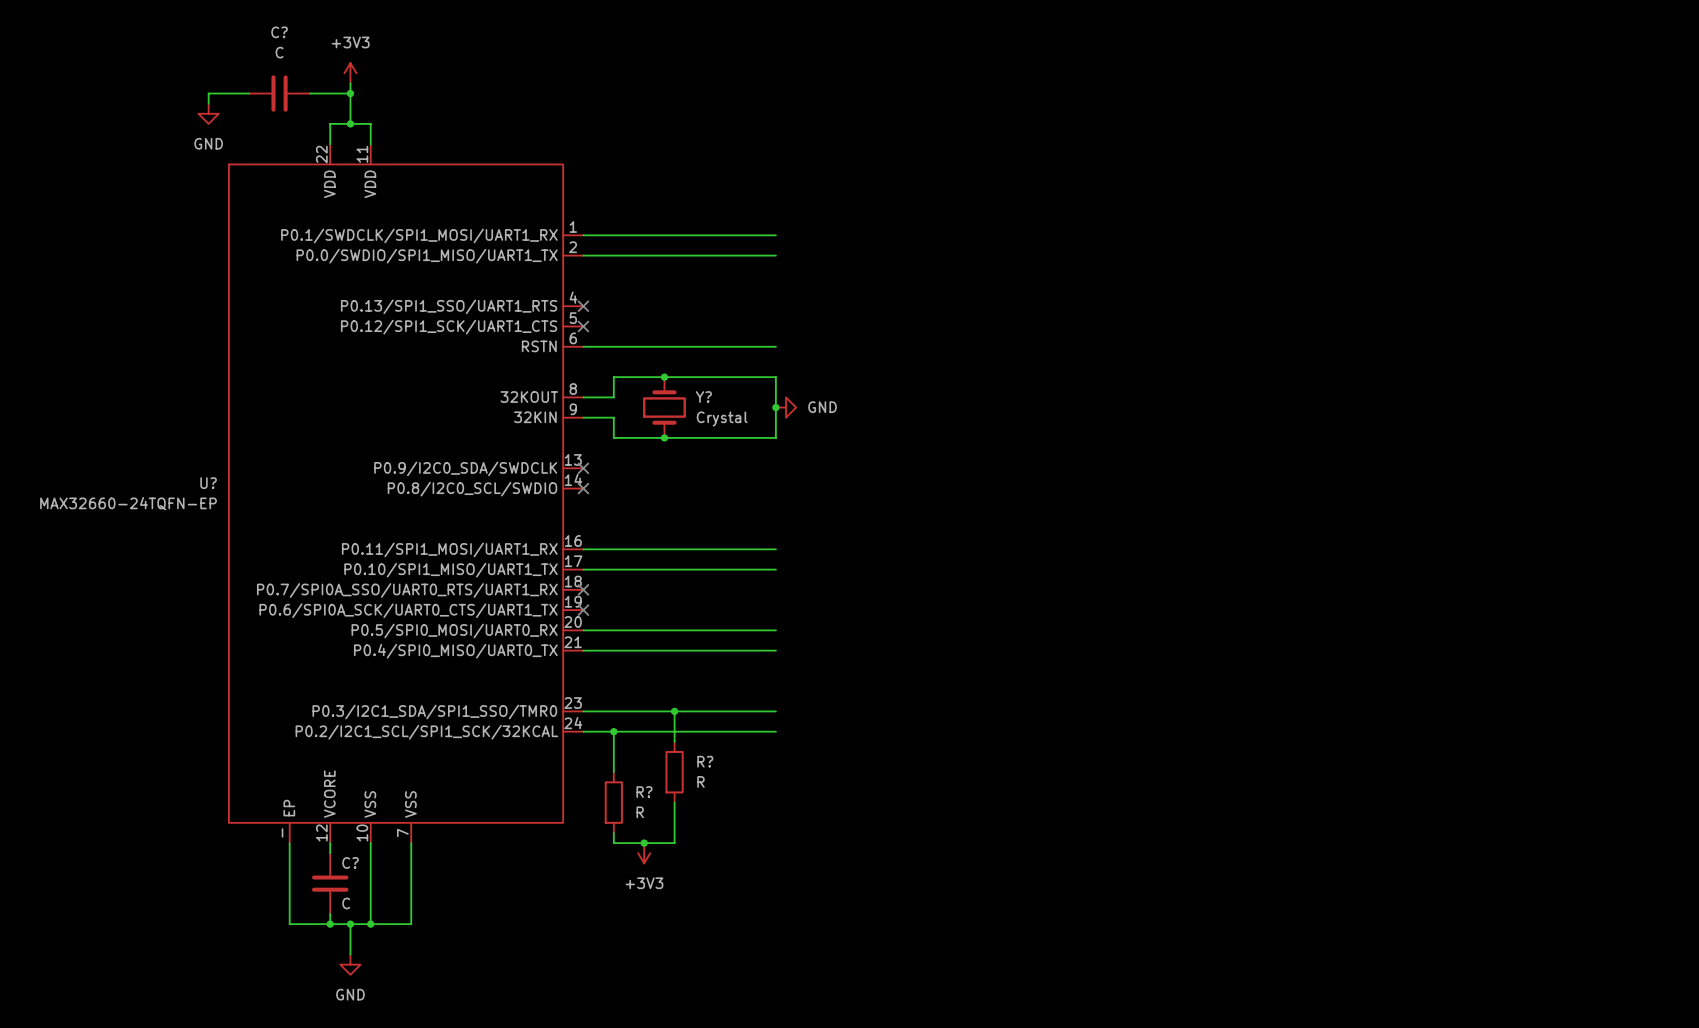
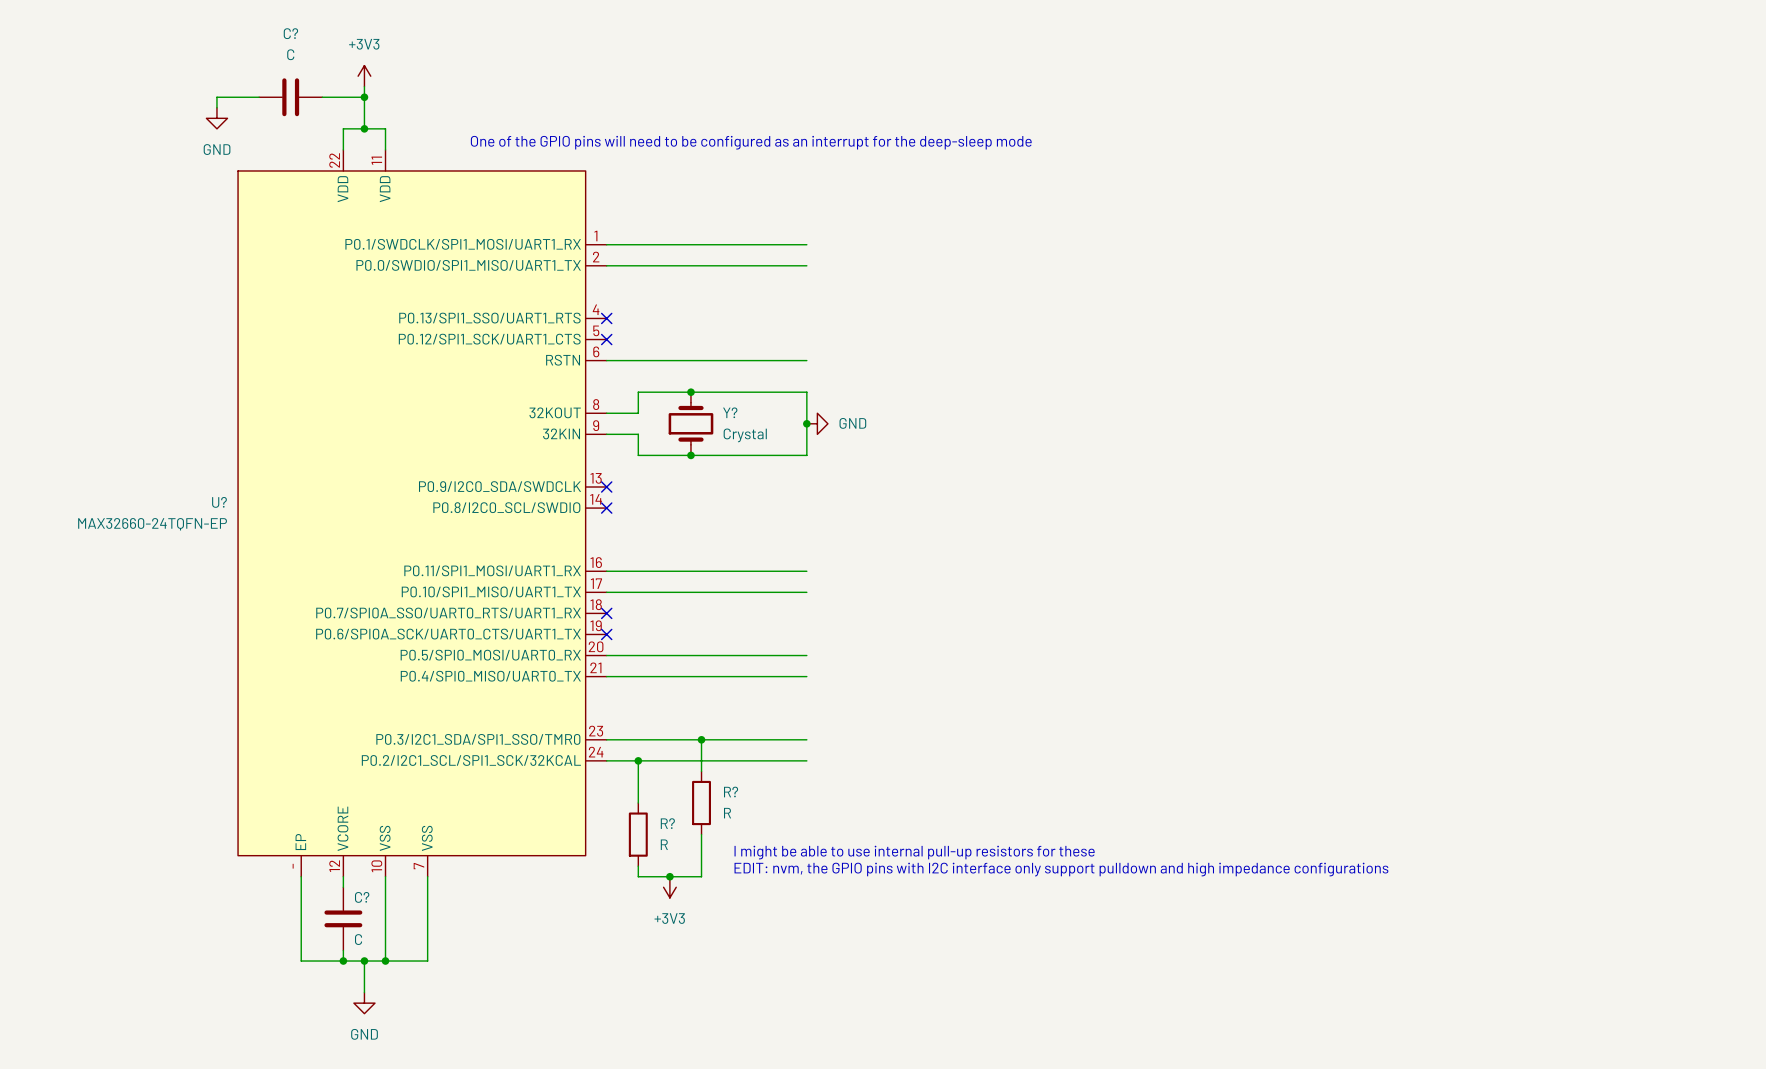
text: none -> One of the GPIO pins will need to be configured as an interrupt for the deep-sleep mode (751, 142)
text: none -> I might be able to use internal pull-up resistors for these (914, 852)
text: none -> EDIT: nvm, the GPIO pins with I2C interface only support pulldown and high impedance configurations (1061, 869)

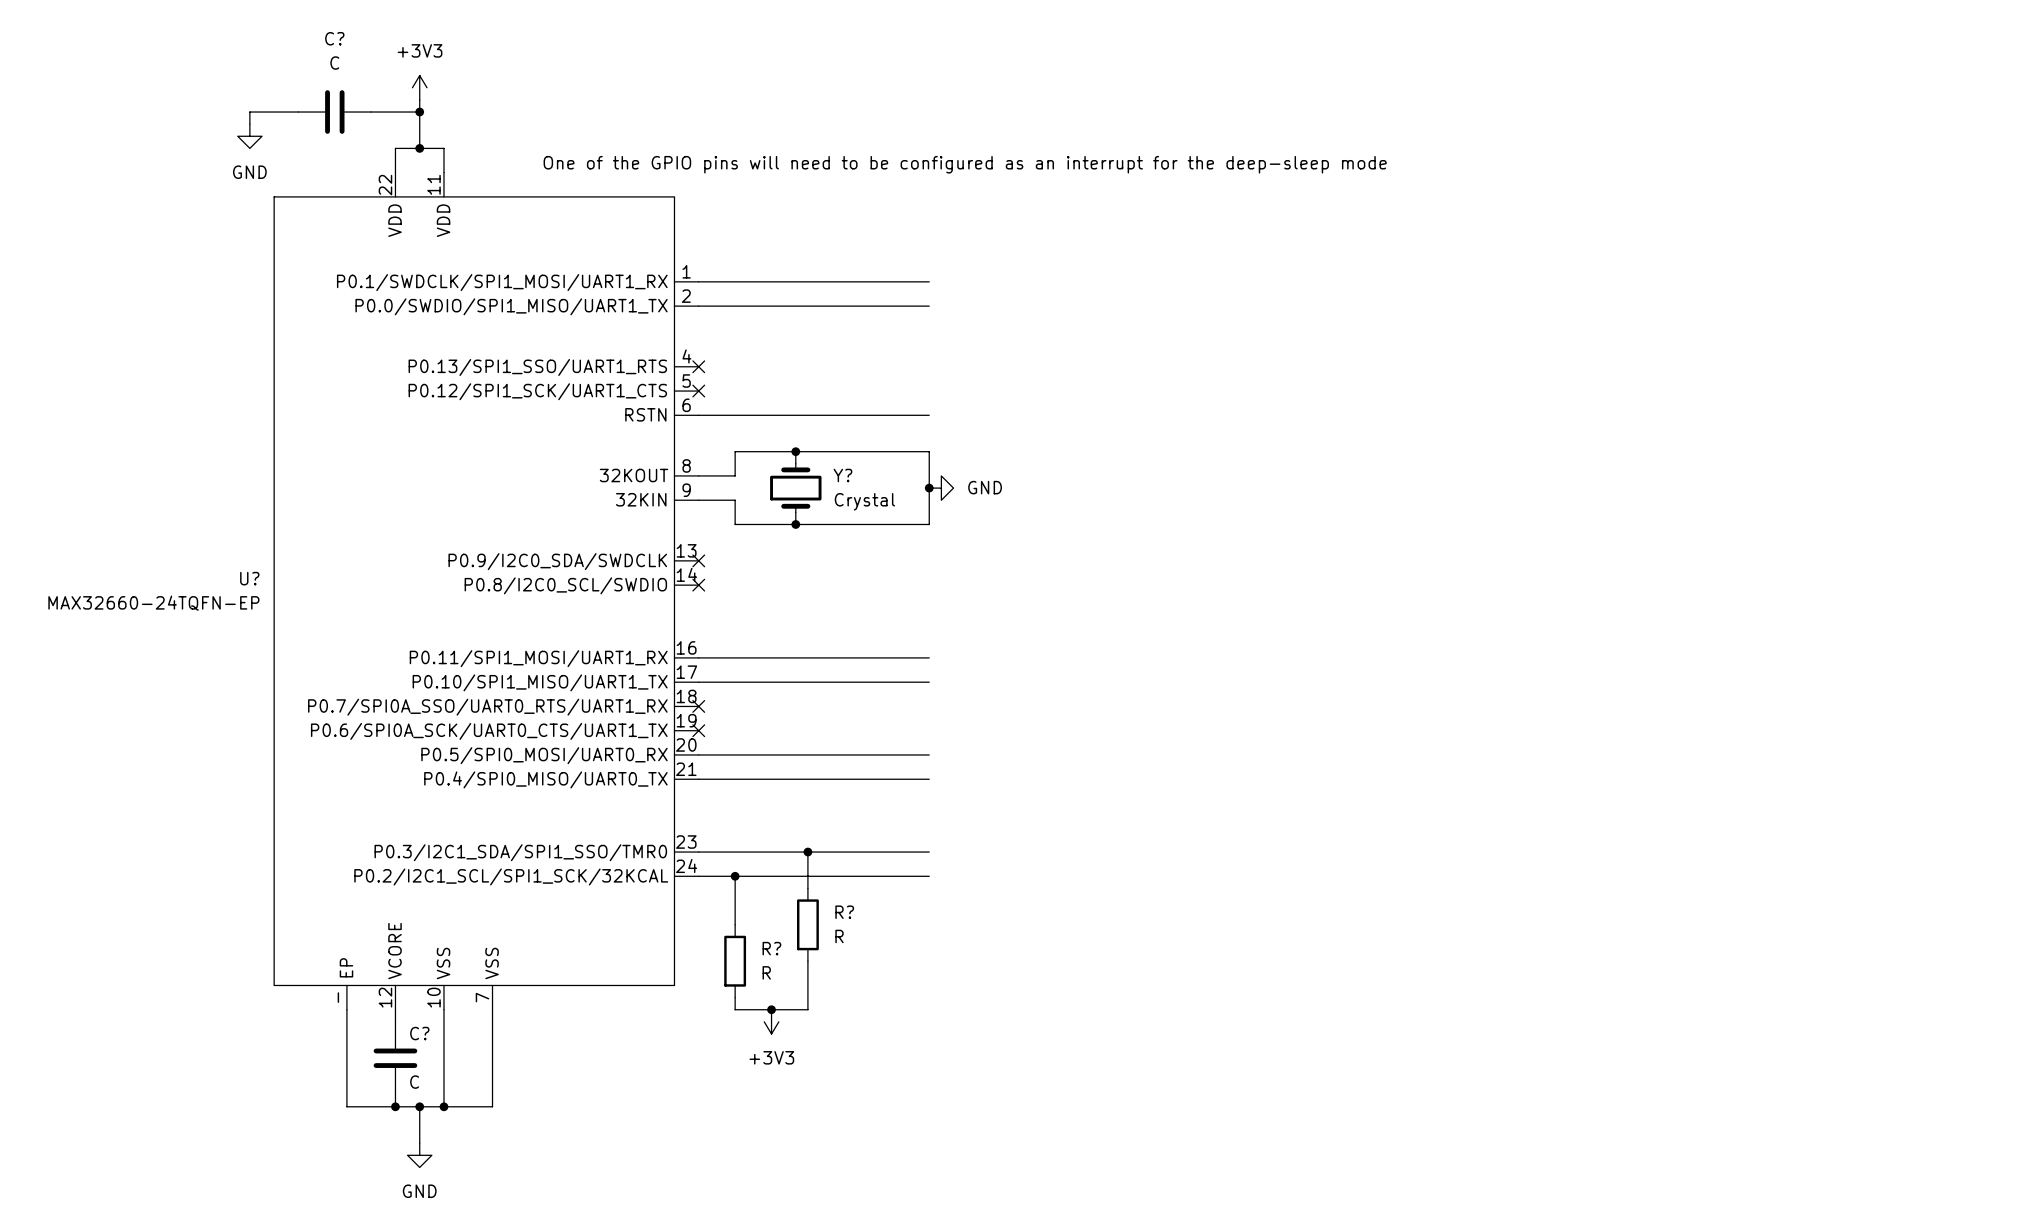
text: I might be able to use internal pull-up resistors for these (914, 852) -> none
text: EDIT: nvm, the GPIO pins with I2C interface only support pulldown and high impedance configurations (1061, 869) -> none

